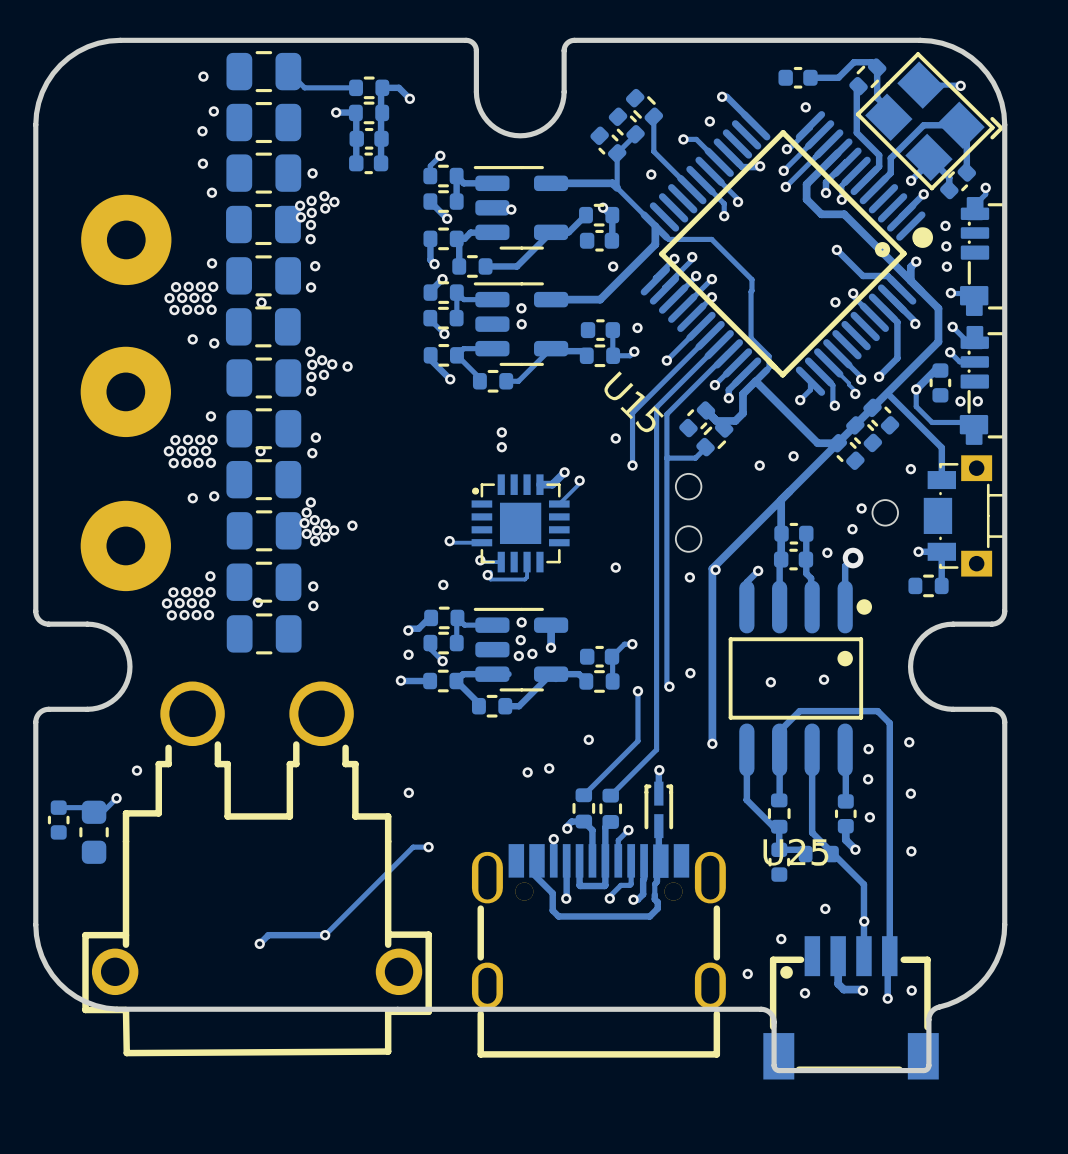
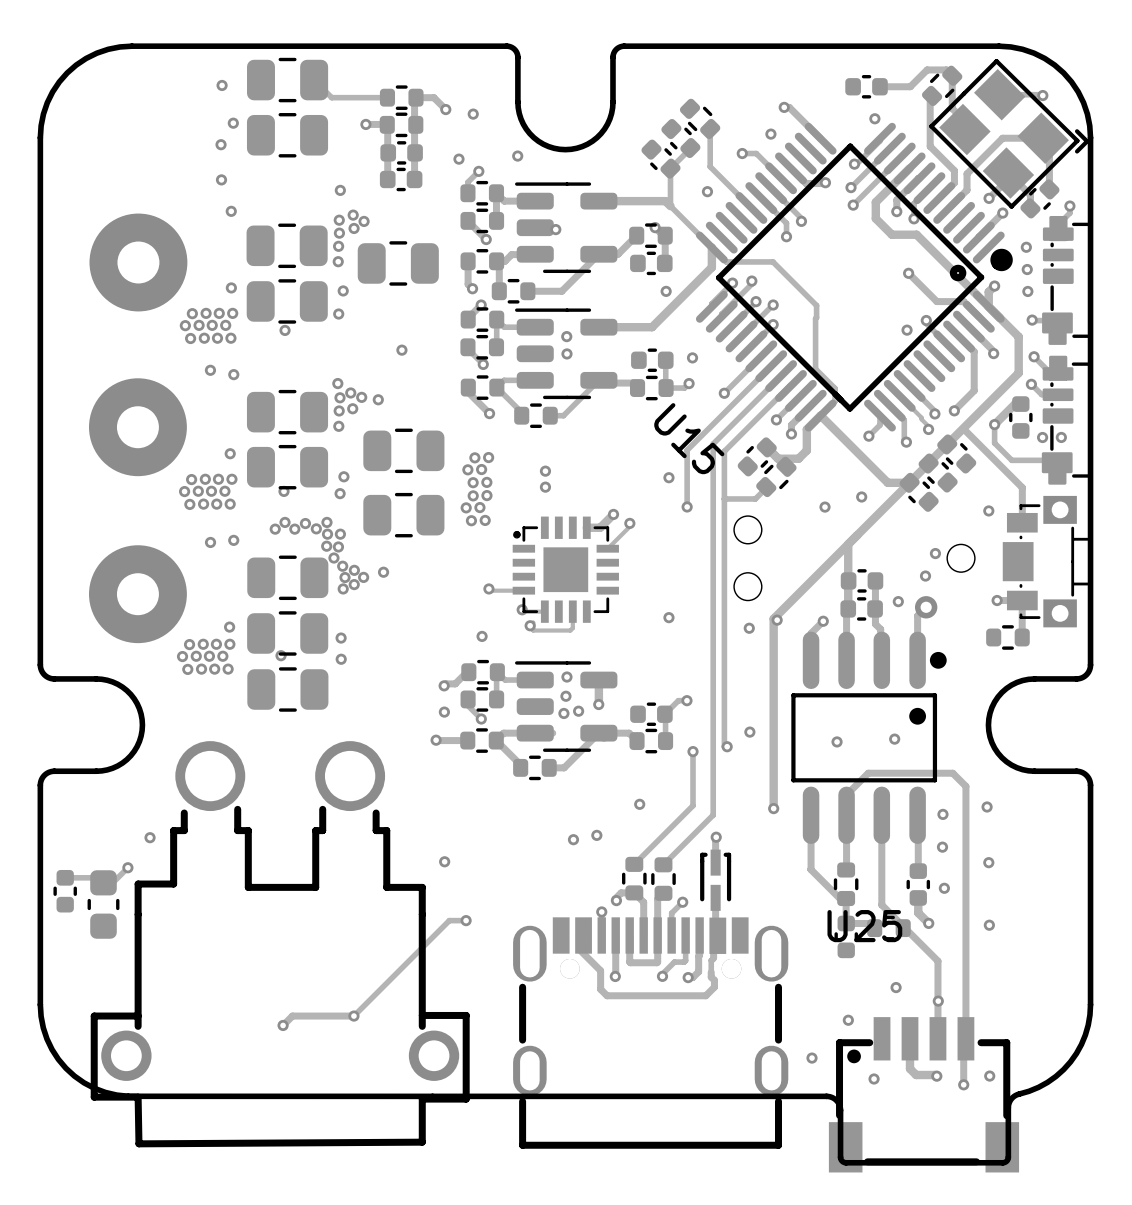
via: none -> (473, 114)
via: none -> (517, 156)
via: none -> (458, 159)
part: (263, 173) -> none
via: (300, 205) -> none
via: (300, 217) -> none
part: none -> (398, 263)
via: none -> (401, 350)
part: (263, 326) -> none
part: none -> (403, 450)
via: none -> (488, 457)
via: none -> (474, 457)
via: none -> (481, 469)
via: none -> (467, 469)
via: none -> (486, 482)
via: none -> (473, 482)
via: none -> (486, 495)
via: none -> (473, 495)
via: none -> (466, 507)
via: none -> (479, 507)
part: none -> (403, 515)
via: none -> (485, 520)
via: none -> (471, 520)
via: none -> (285, 522)
part: (263, 479) -> none
via: none -> (326, 522)
via: none -> (305, 523)
via: none -> (275, 529)
via: none -> (294, 529)
via: none -> (316, 528)
via: none -> (327, 534)
via: none -> (340, 534)
via: none -> (326, 546)
via: (304, 523) -> none
via: (306, 533) -> none

